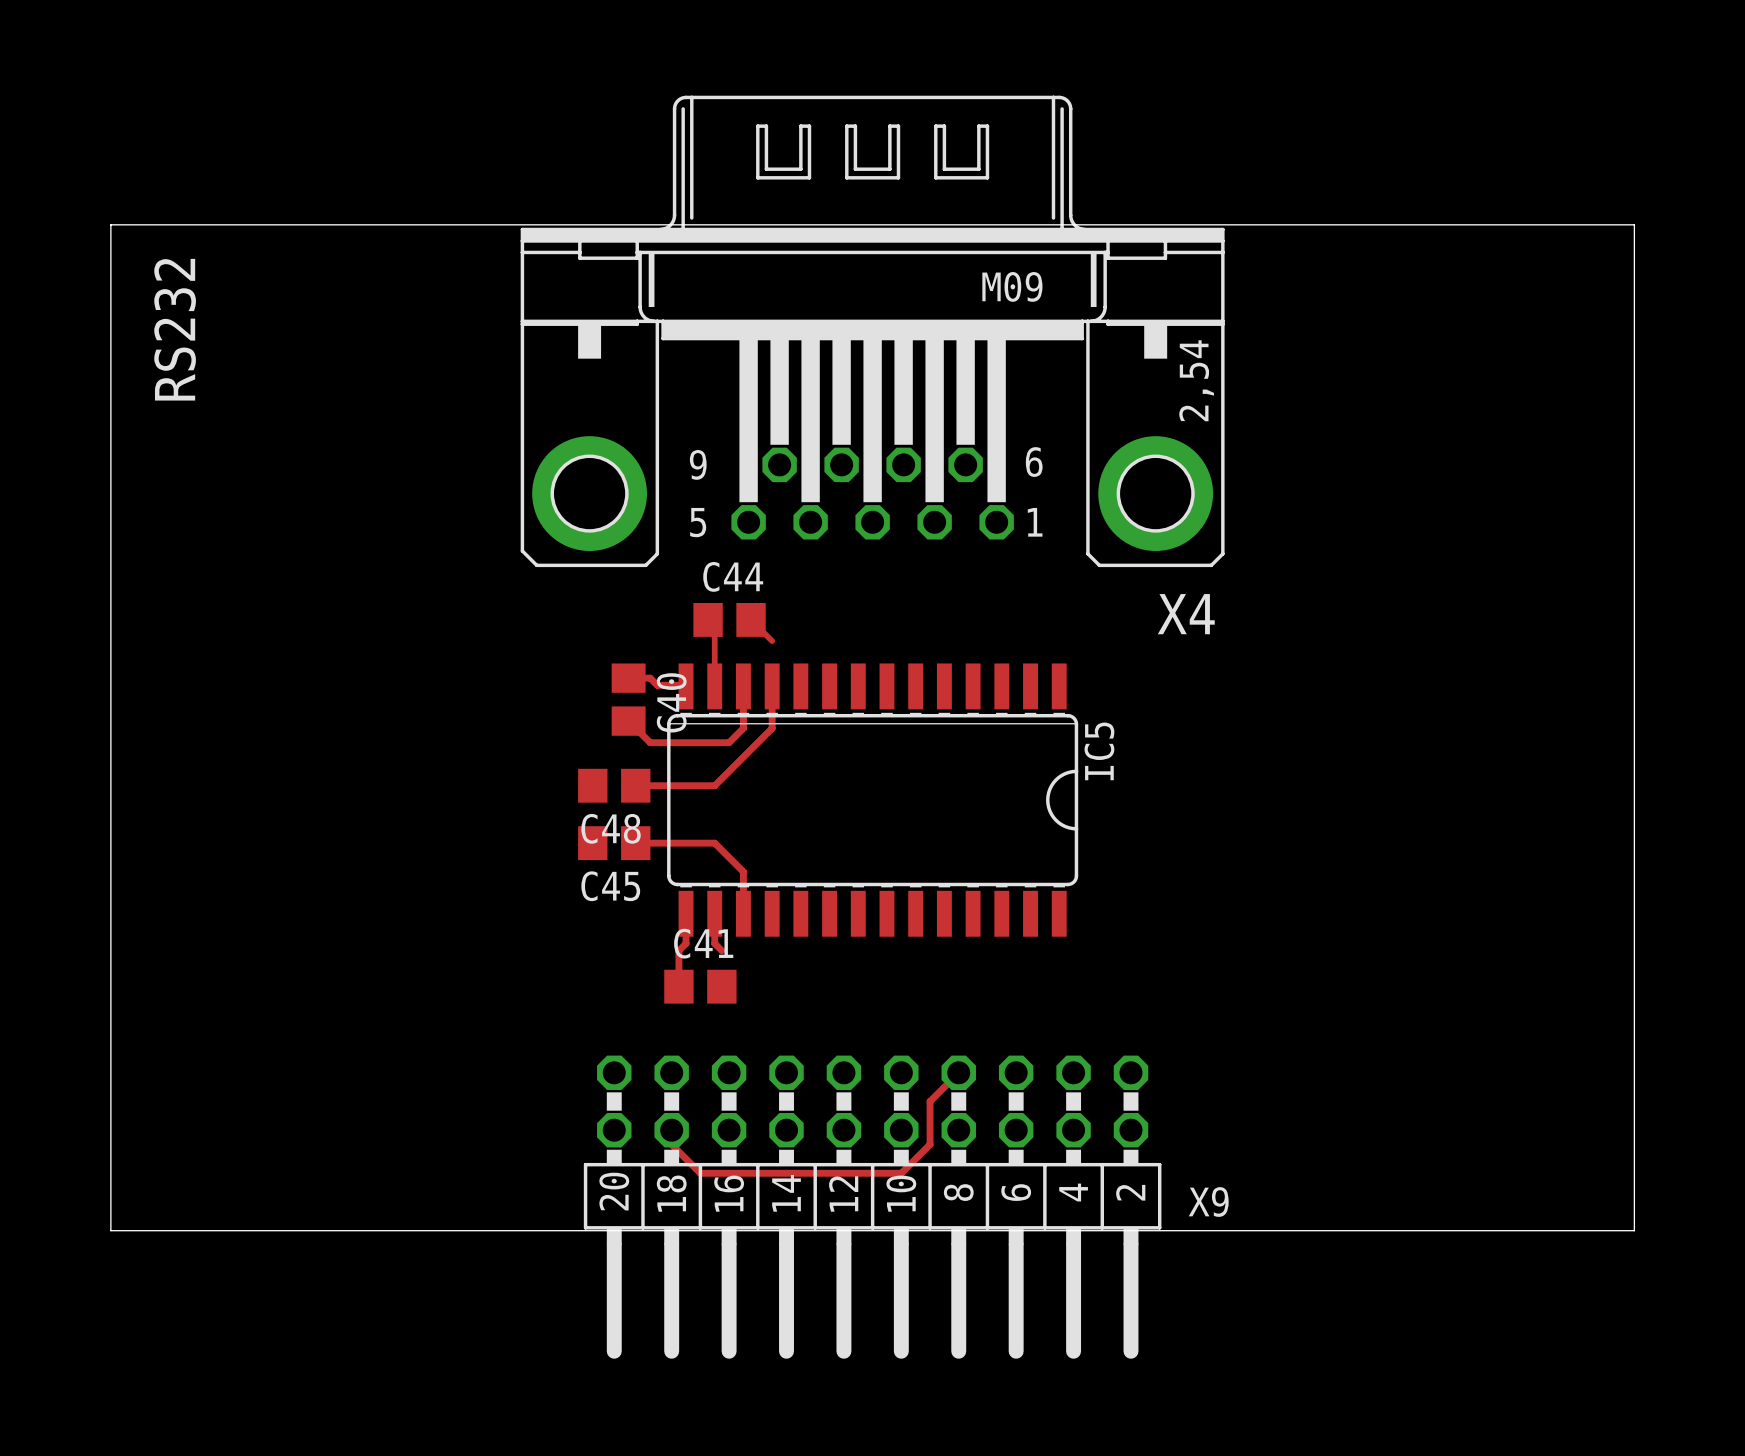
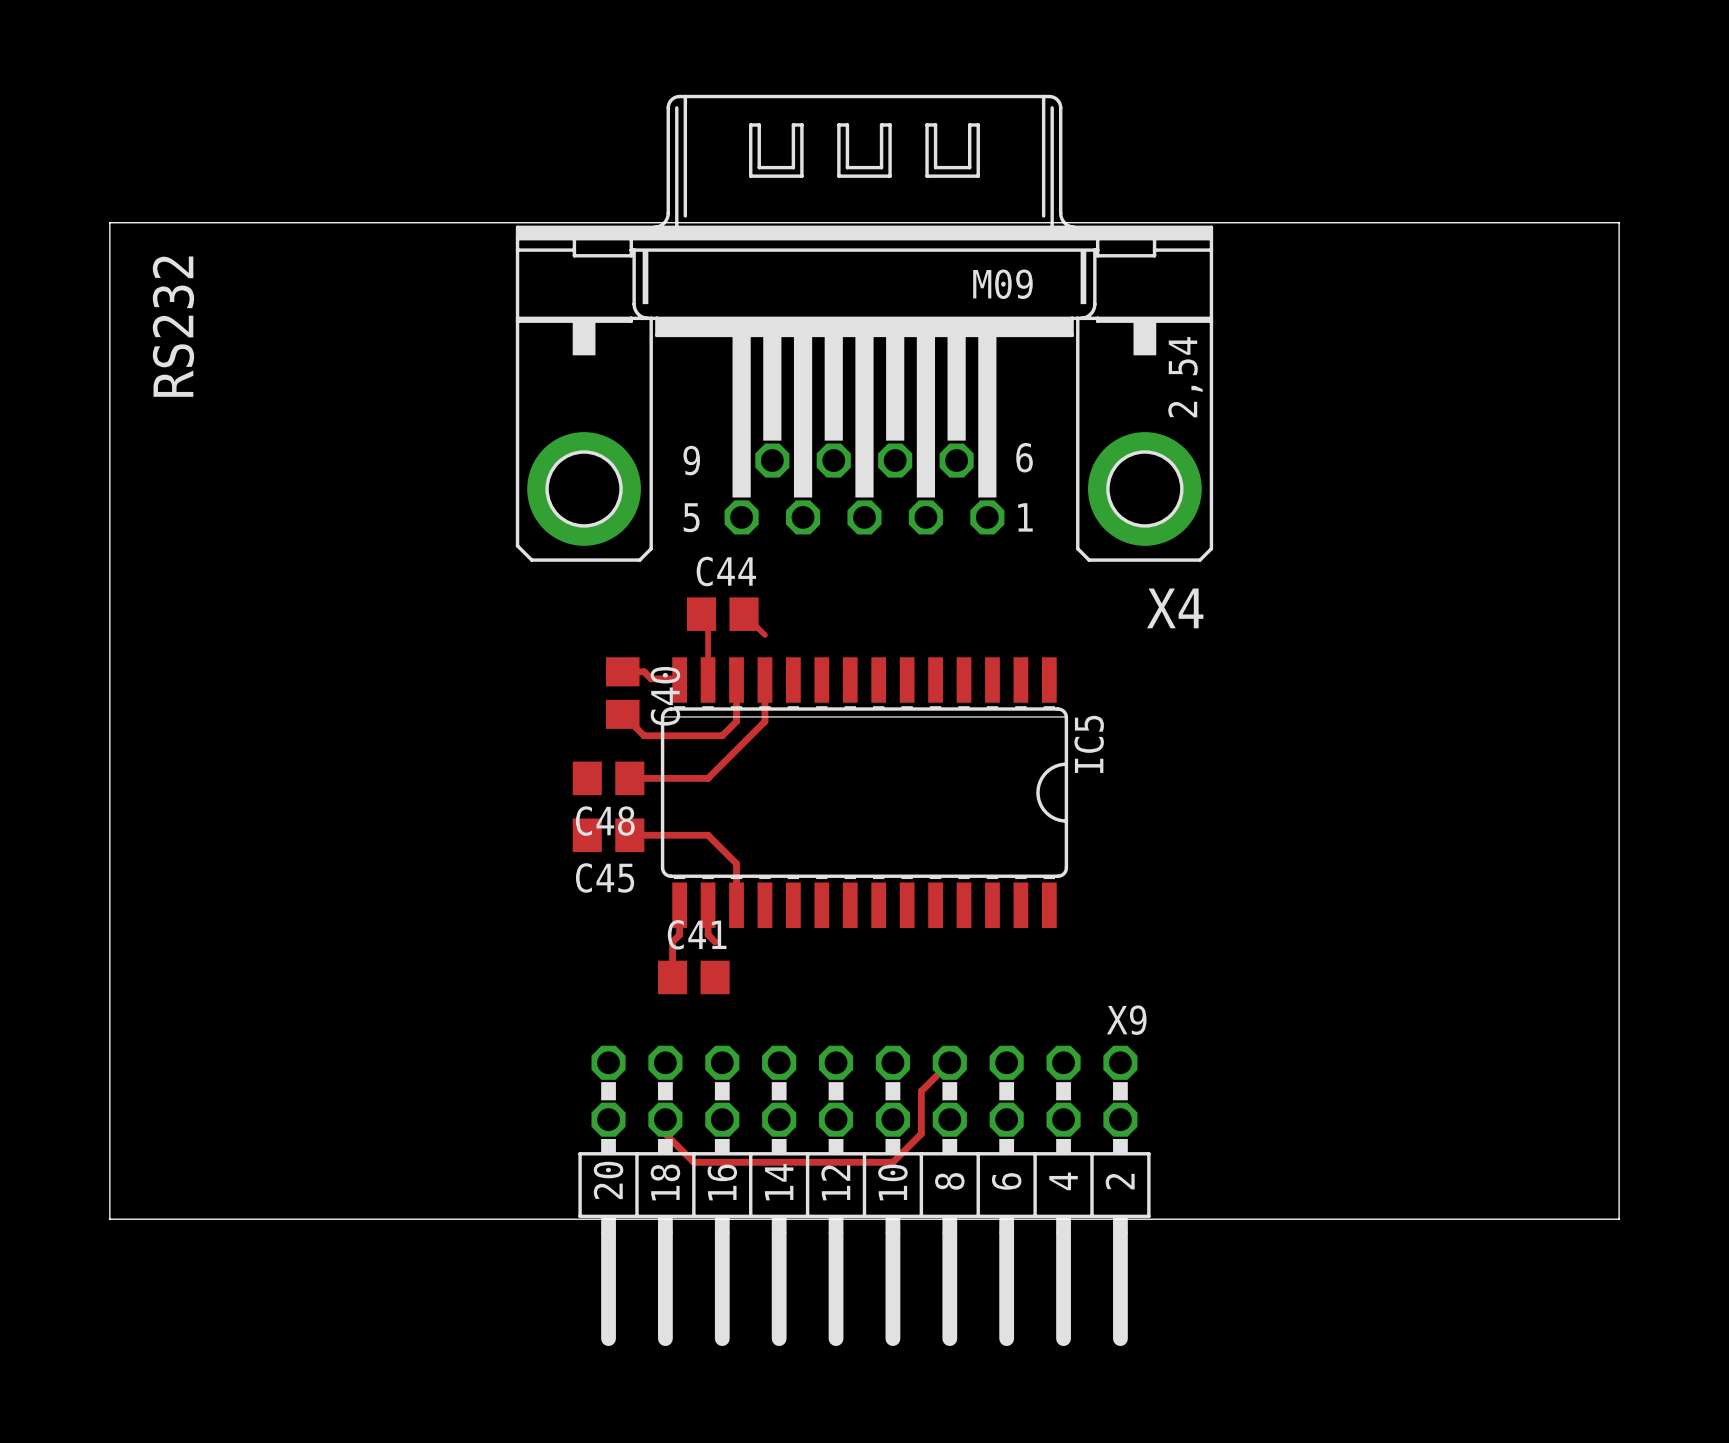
X9 name position: X9 (1208, 1202) -> X9 (1126, 1020)

